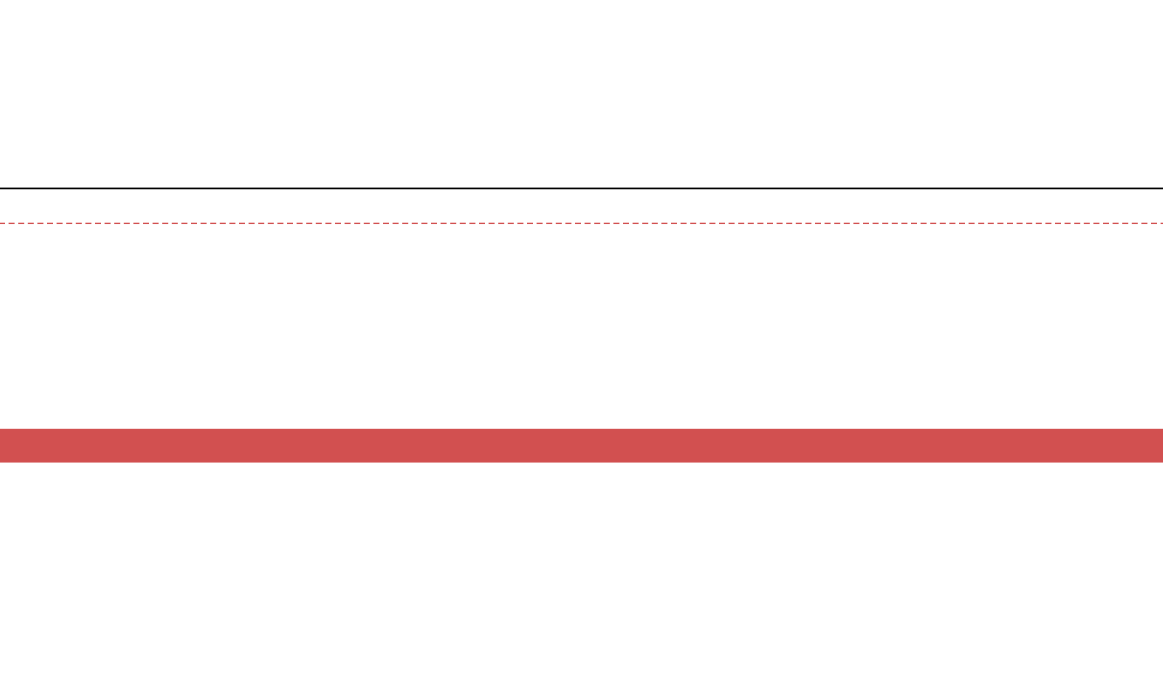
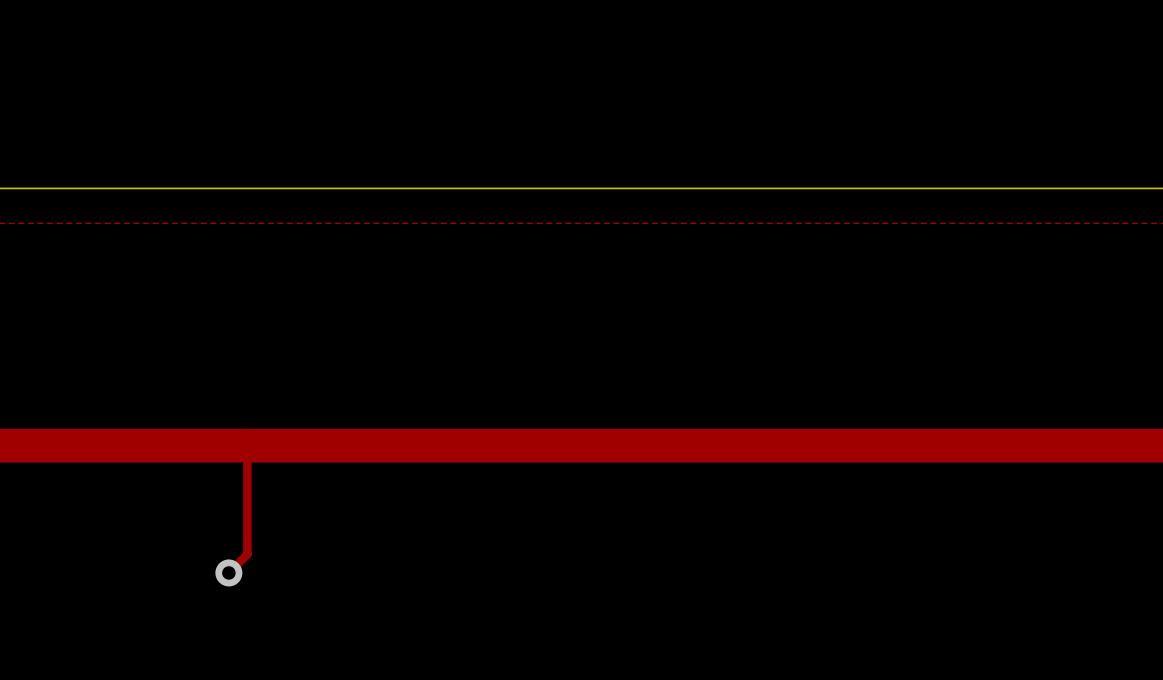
track: none -> (247, 445) (247, 554) (228, 572)
via: none -> (228, 572)

